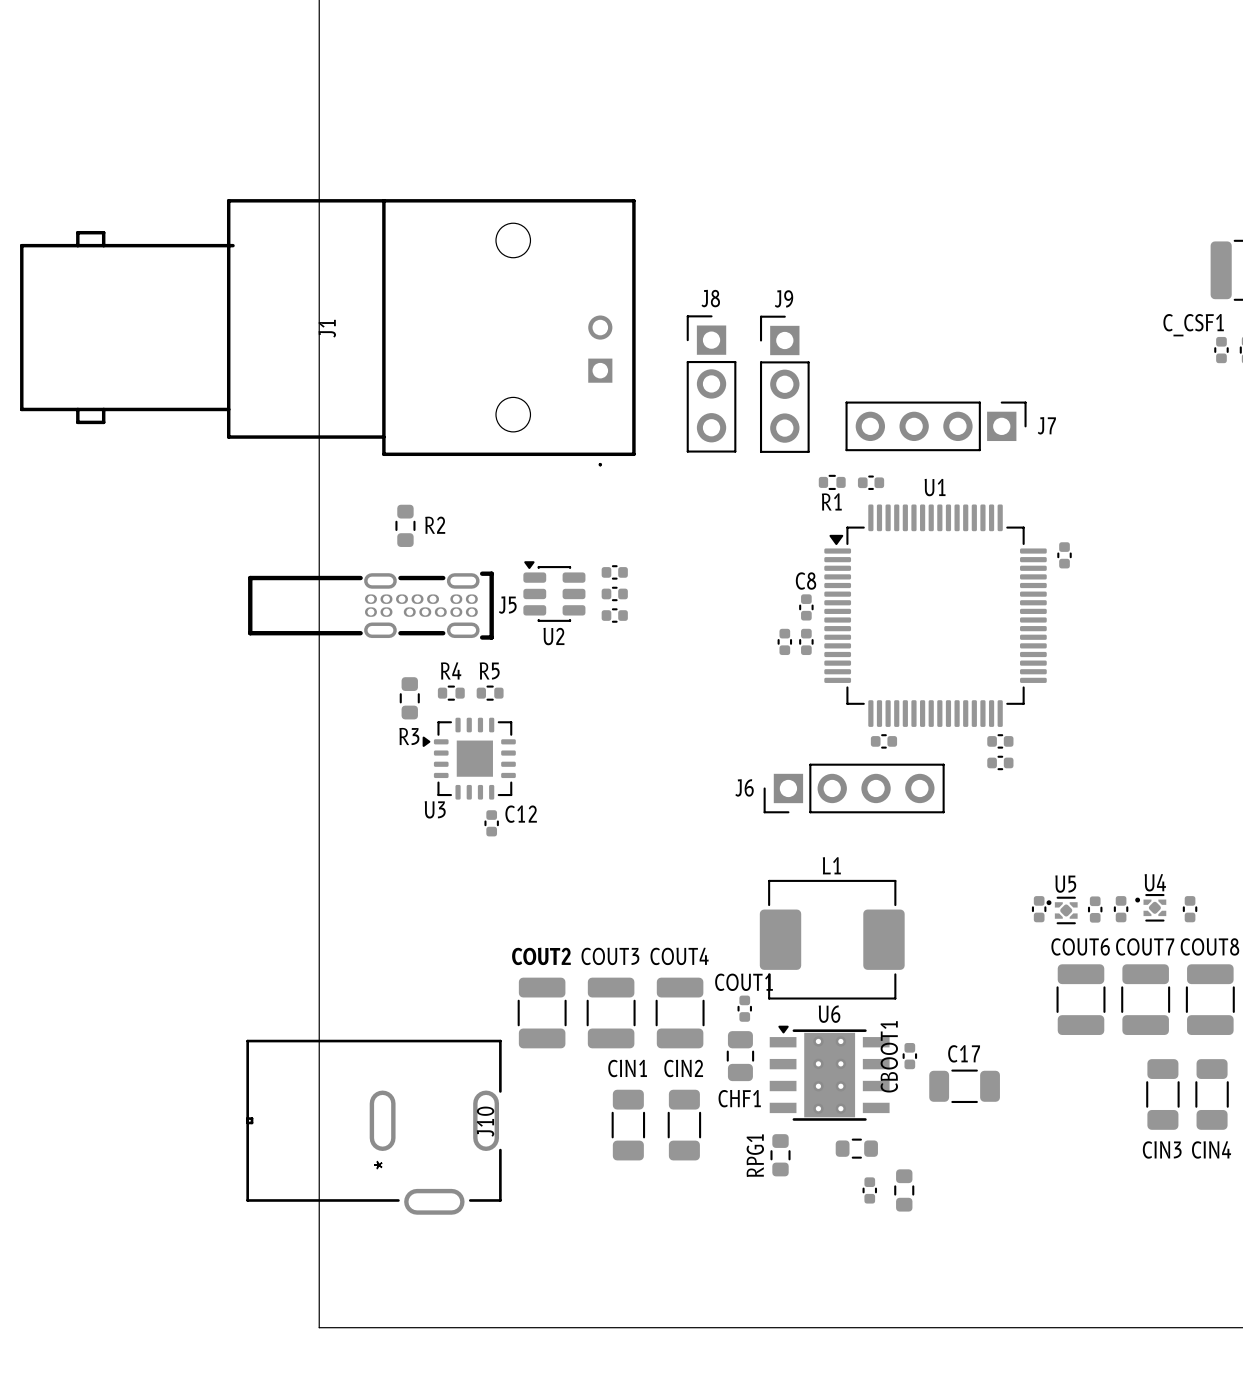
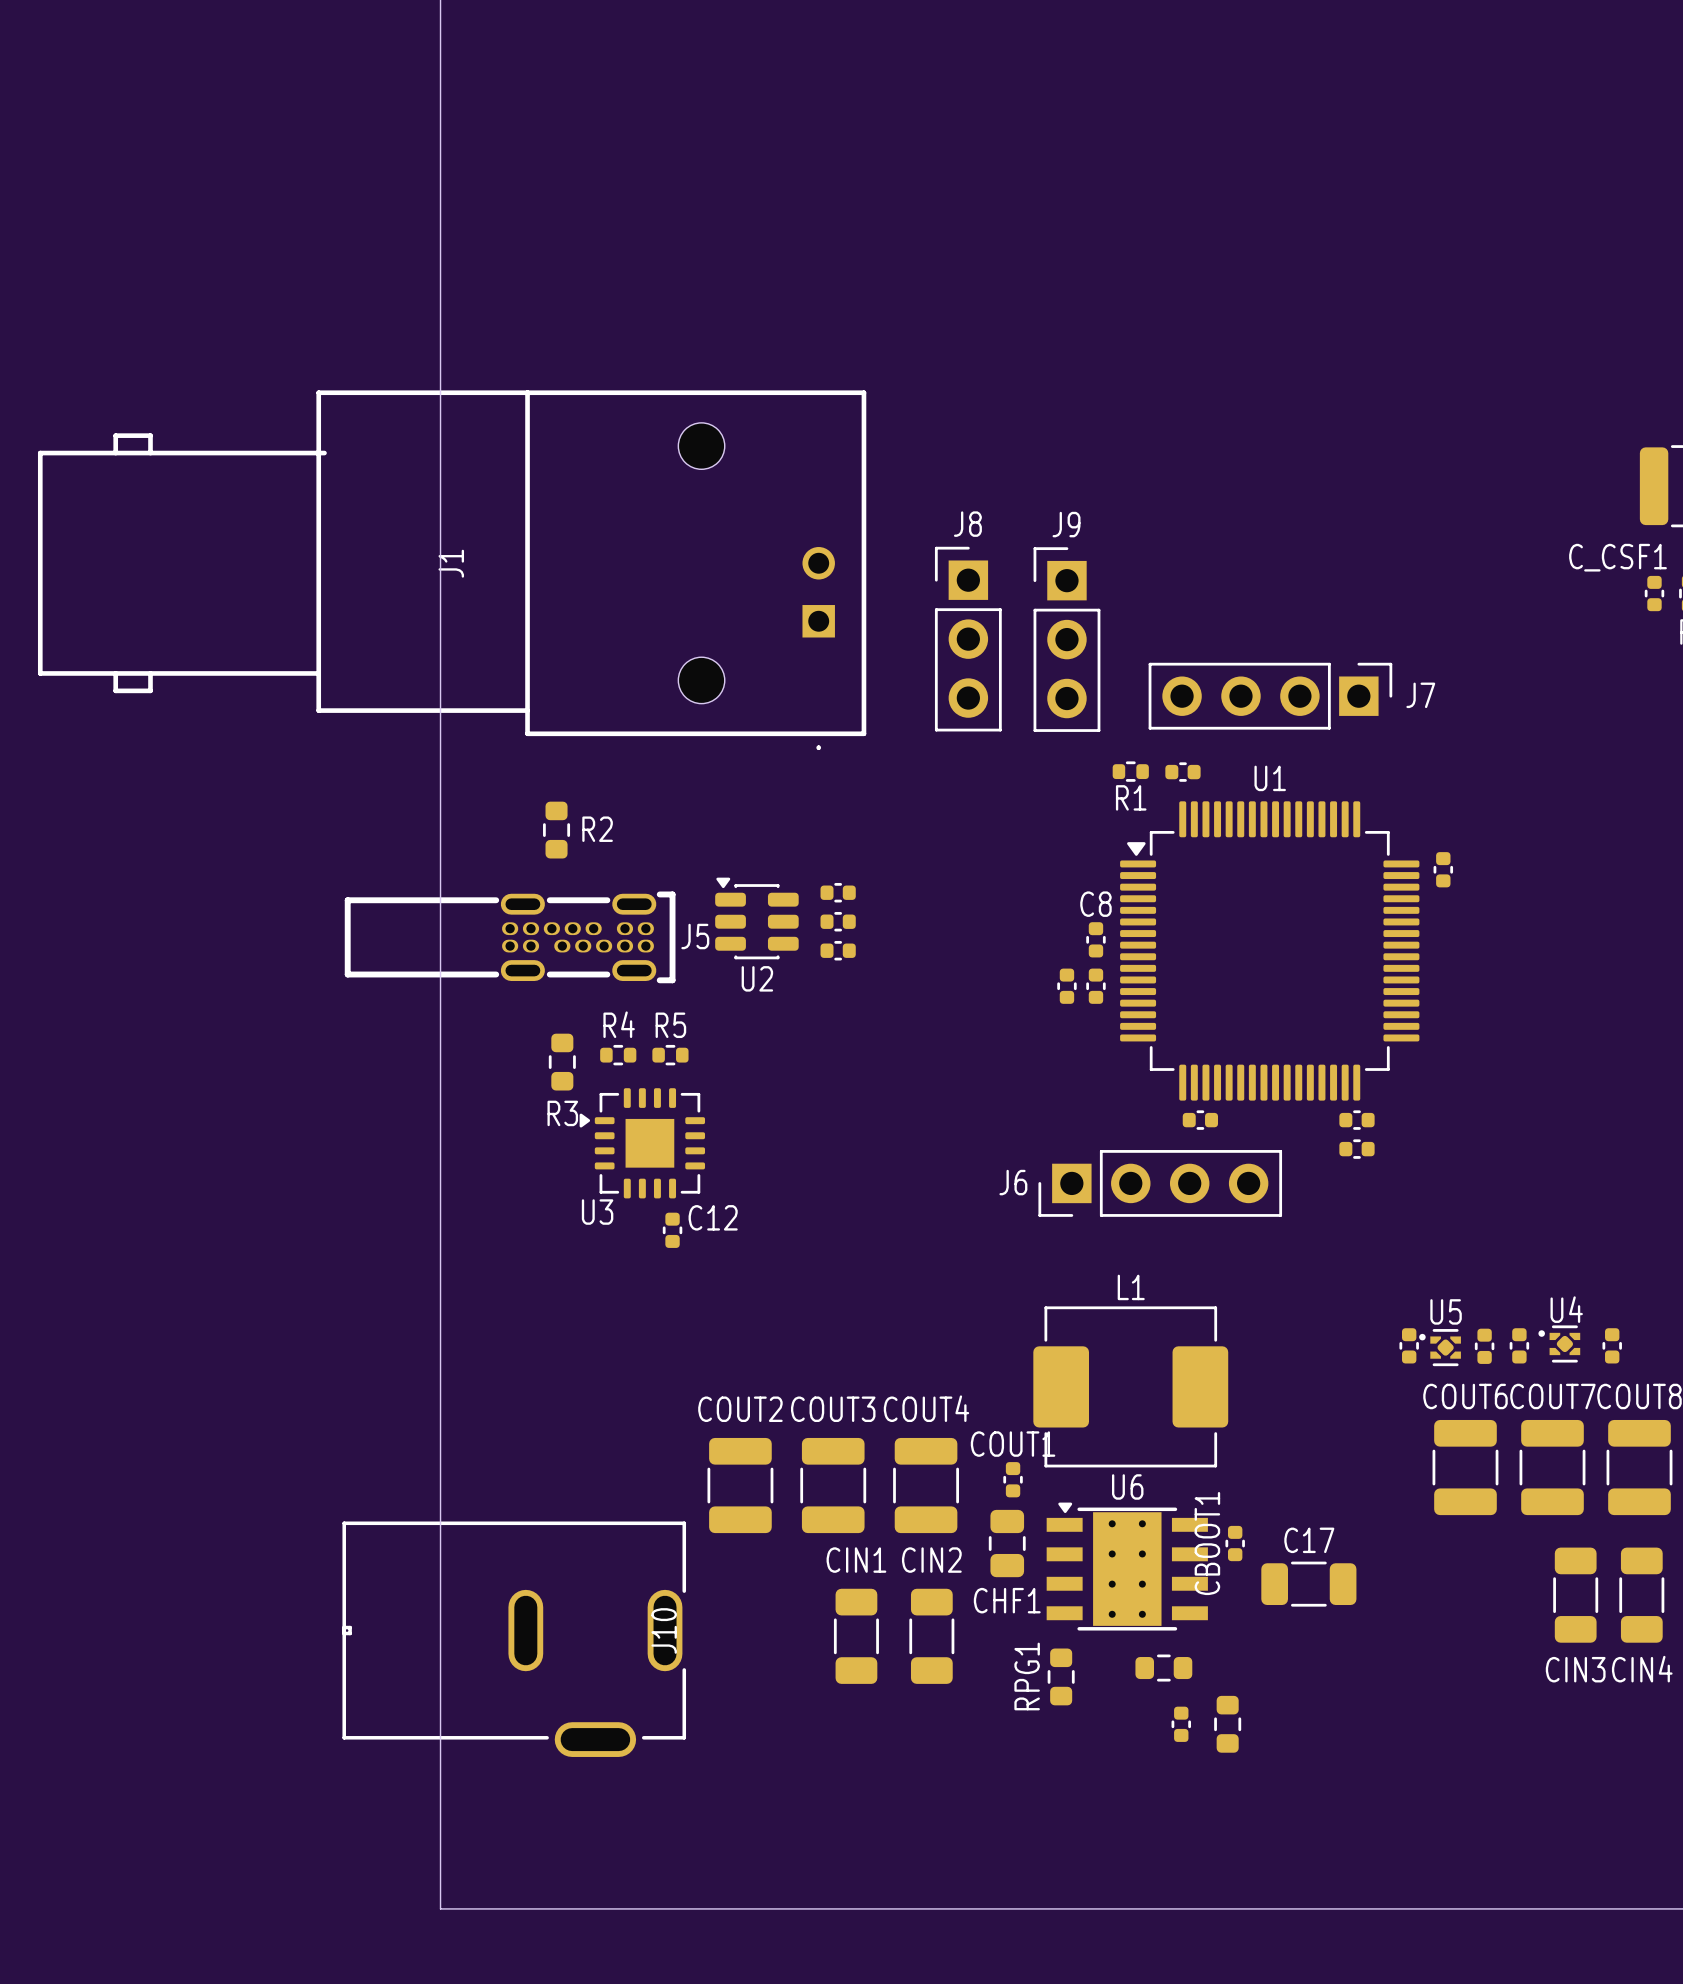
J10 footprint: [246, 1039, 502, 1215] -> [342, 1521, 687, 1757]

